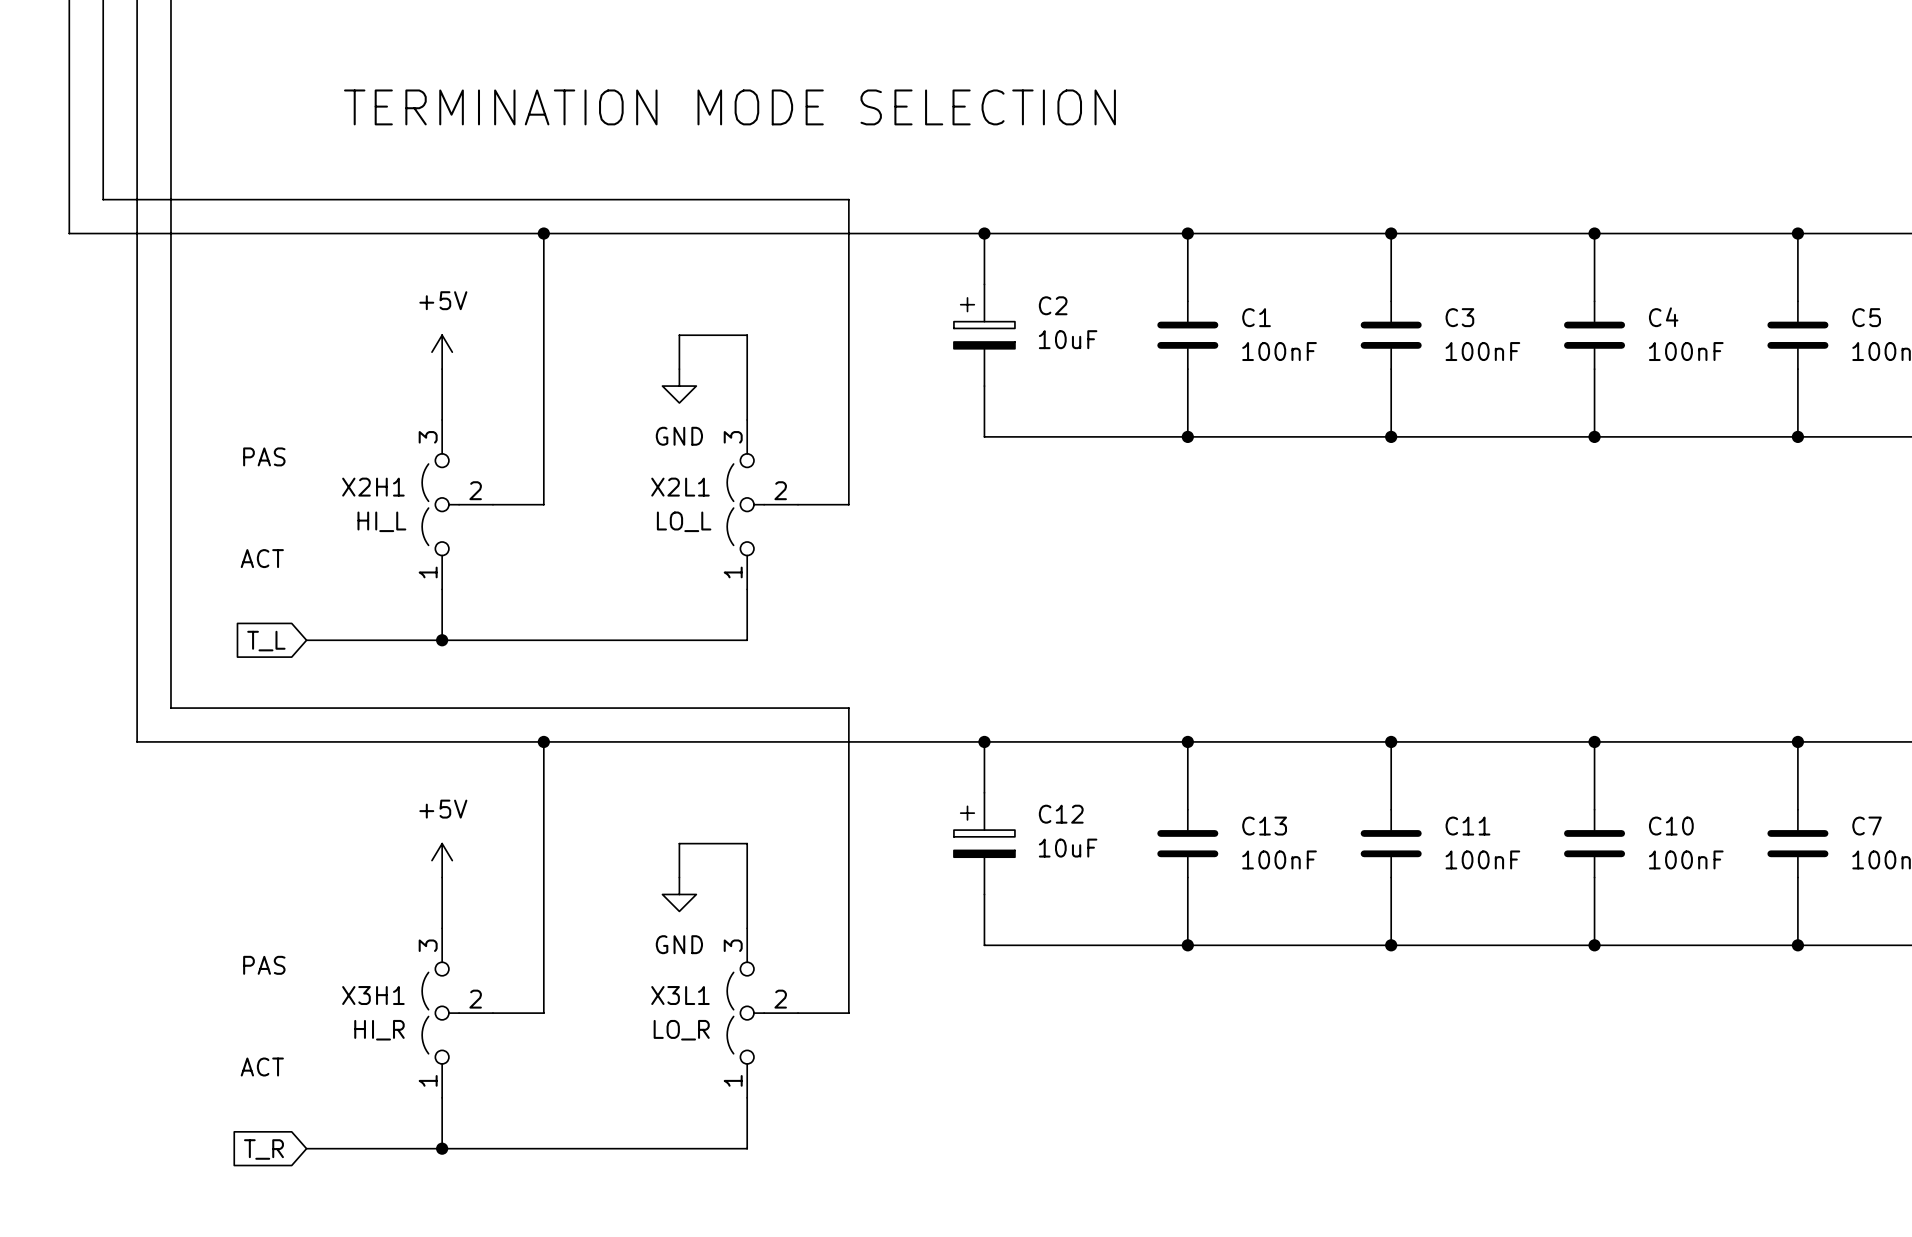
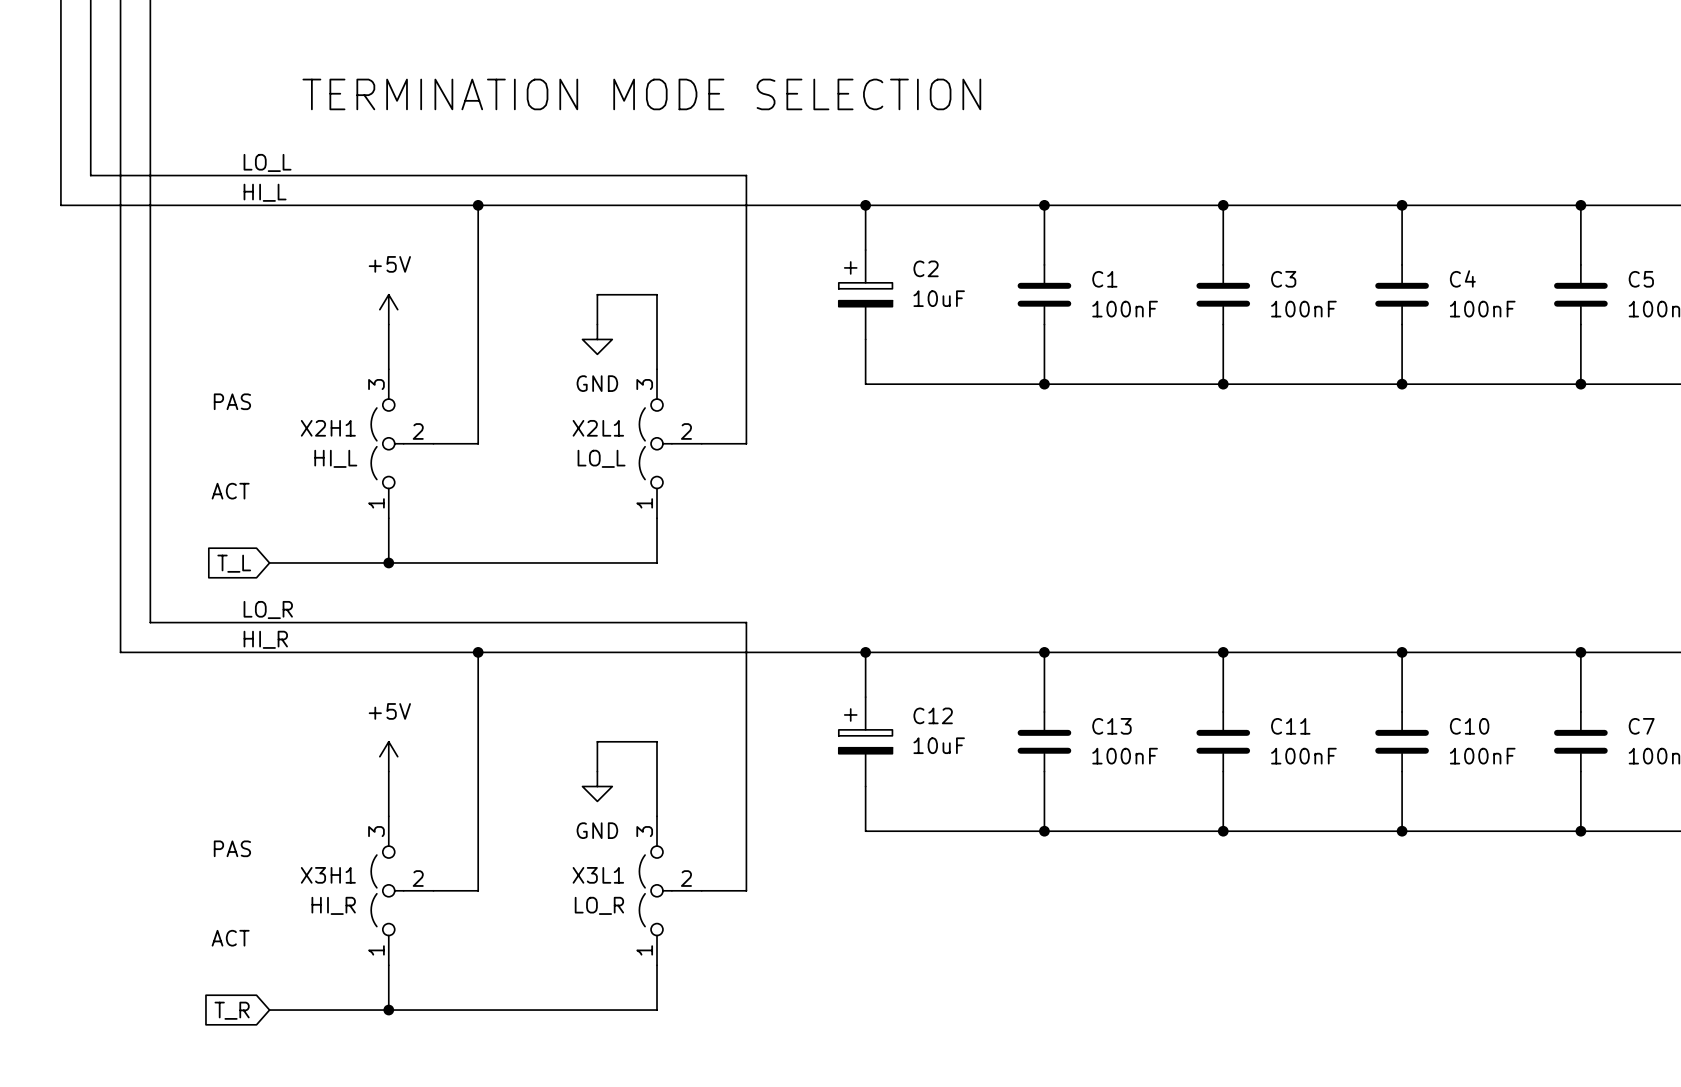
label: none -> LO_L (267, 162)
label: none -> HI_L (265, 192)
label: none -> LO_R (268, 610)
label: none -> HI_R (265, 639)

